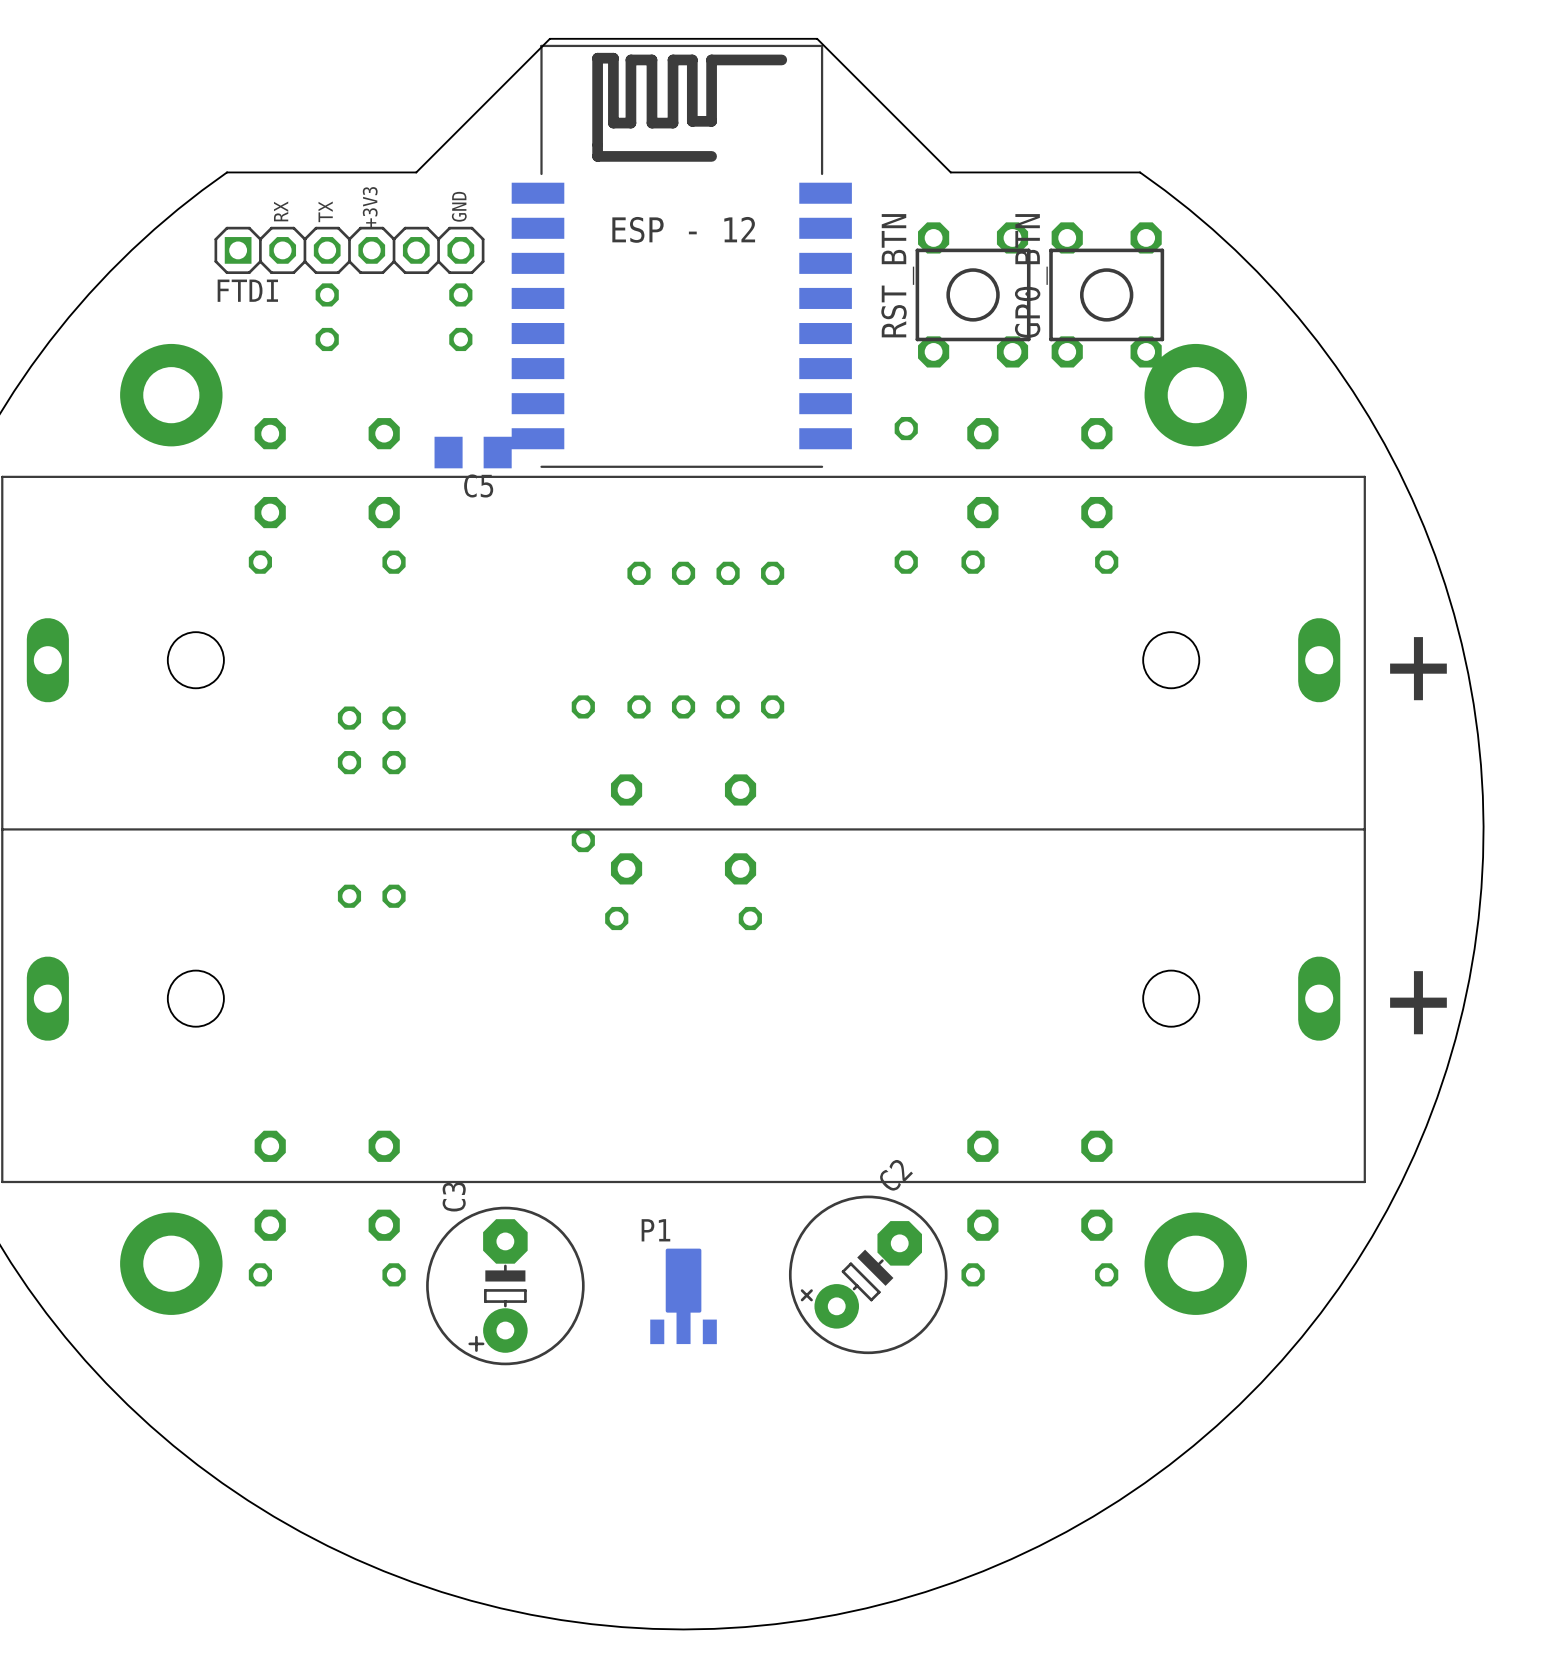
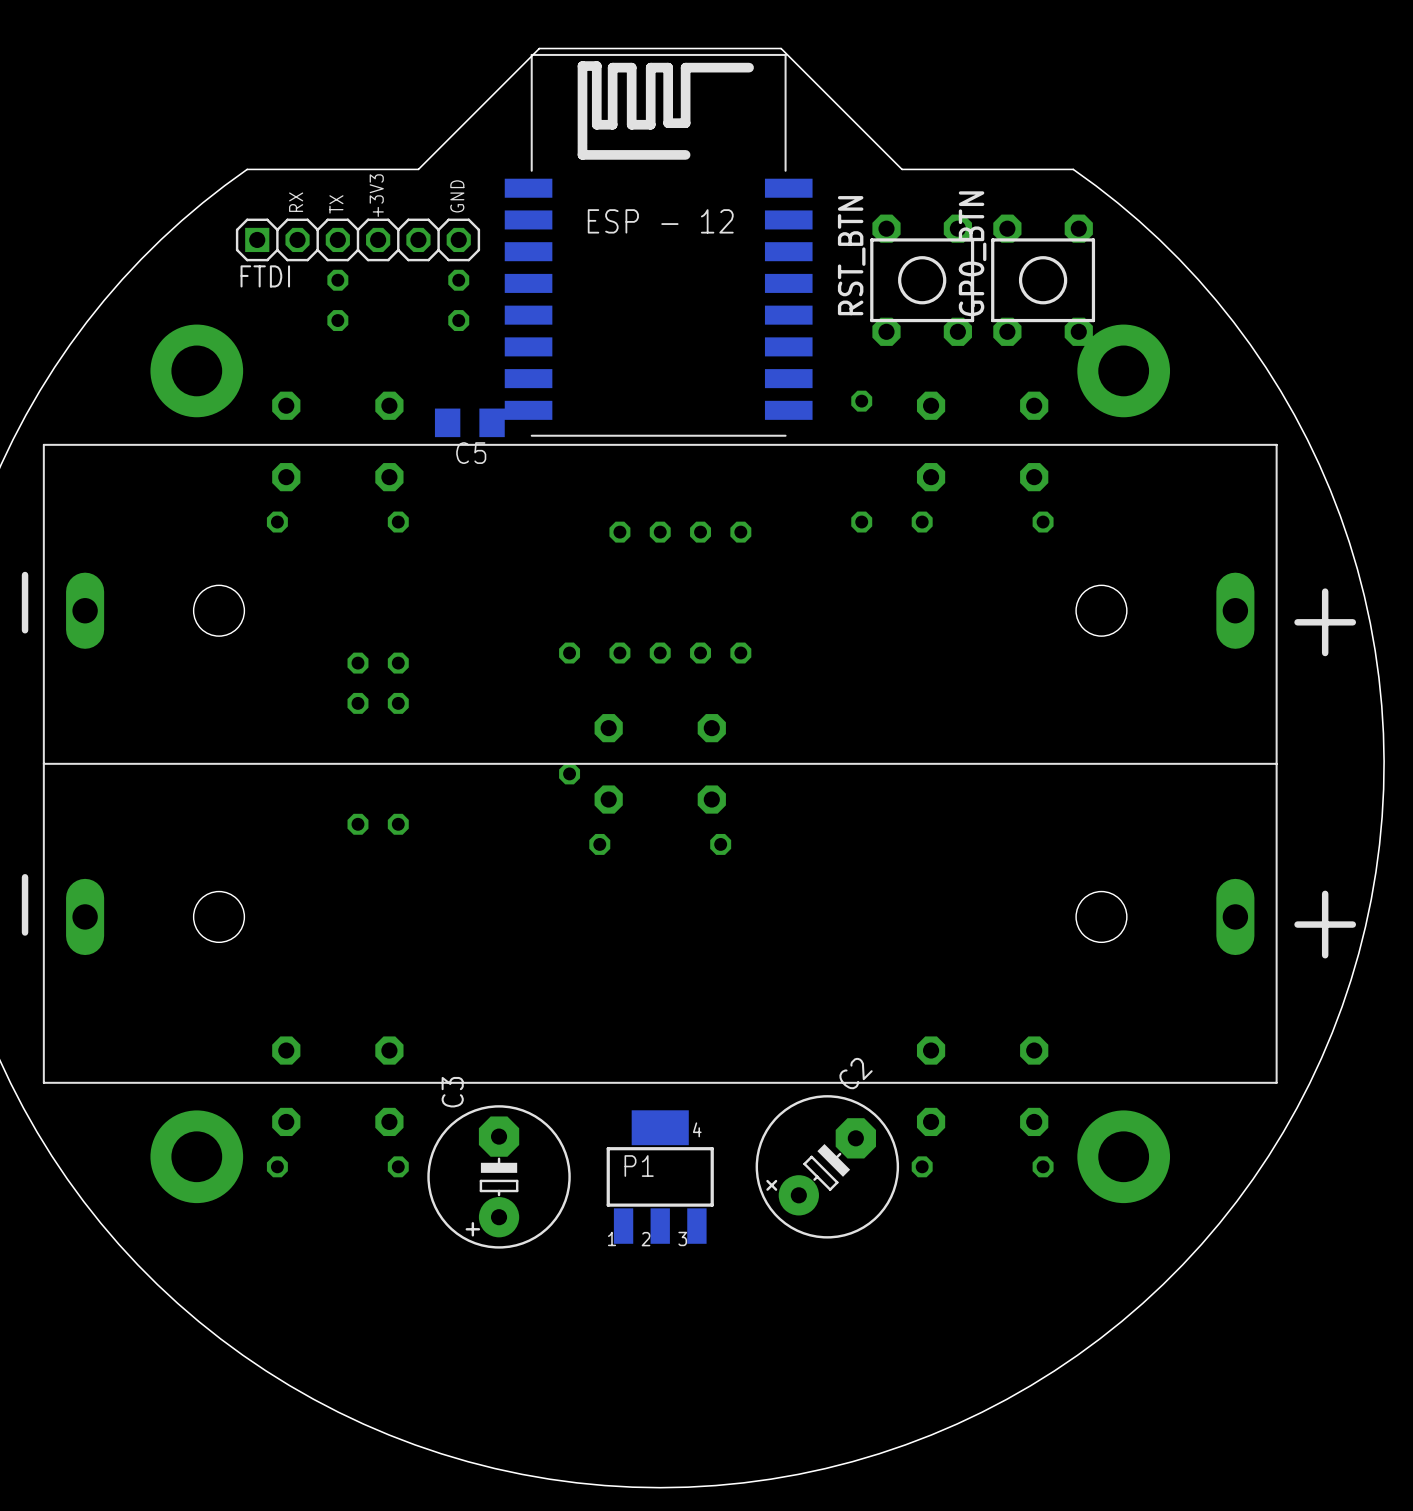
P1 name position: P1 (655, 1230) -> P1 (639, 1166)
P1 footprint: [650, 1248, 717, 1345] -> [606, 1110, 714, 1244]

